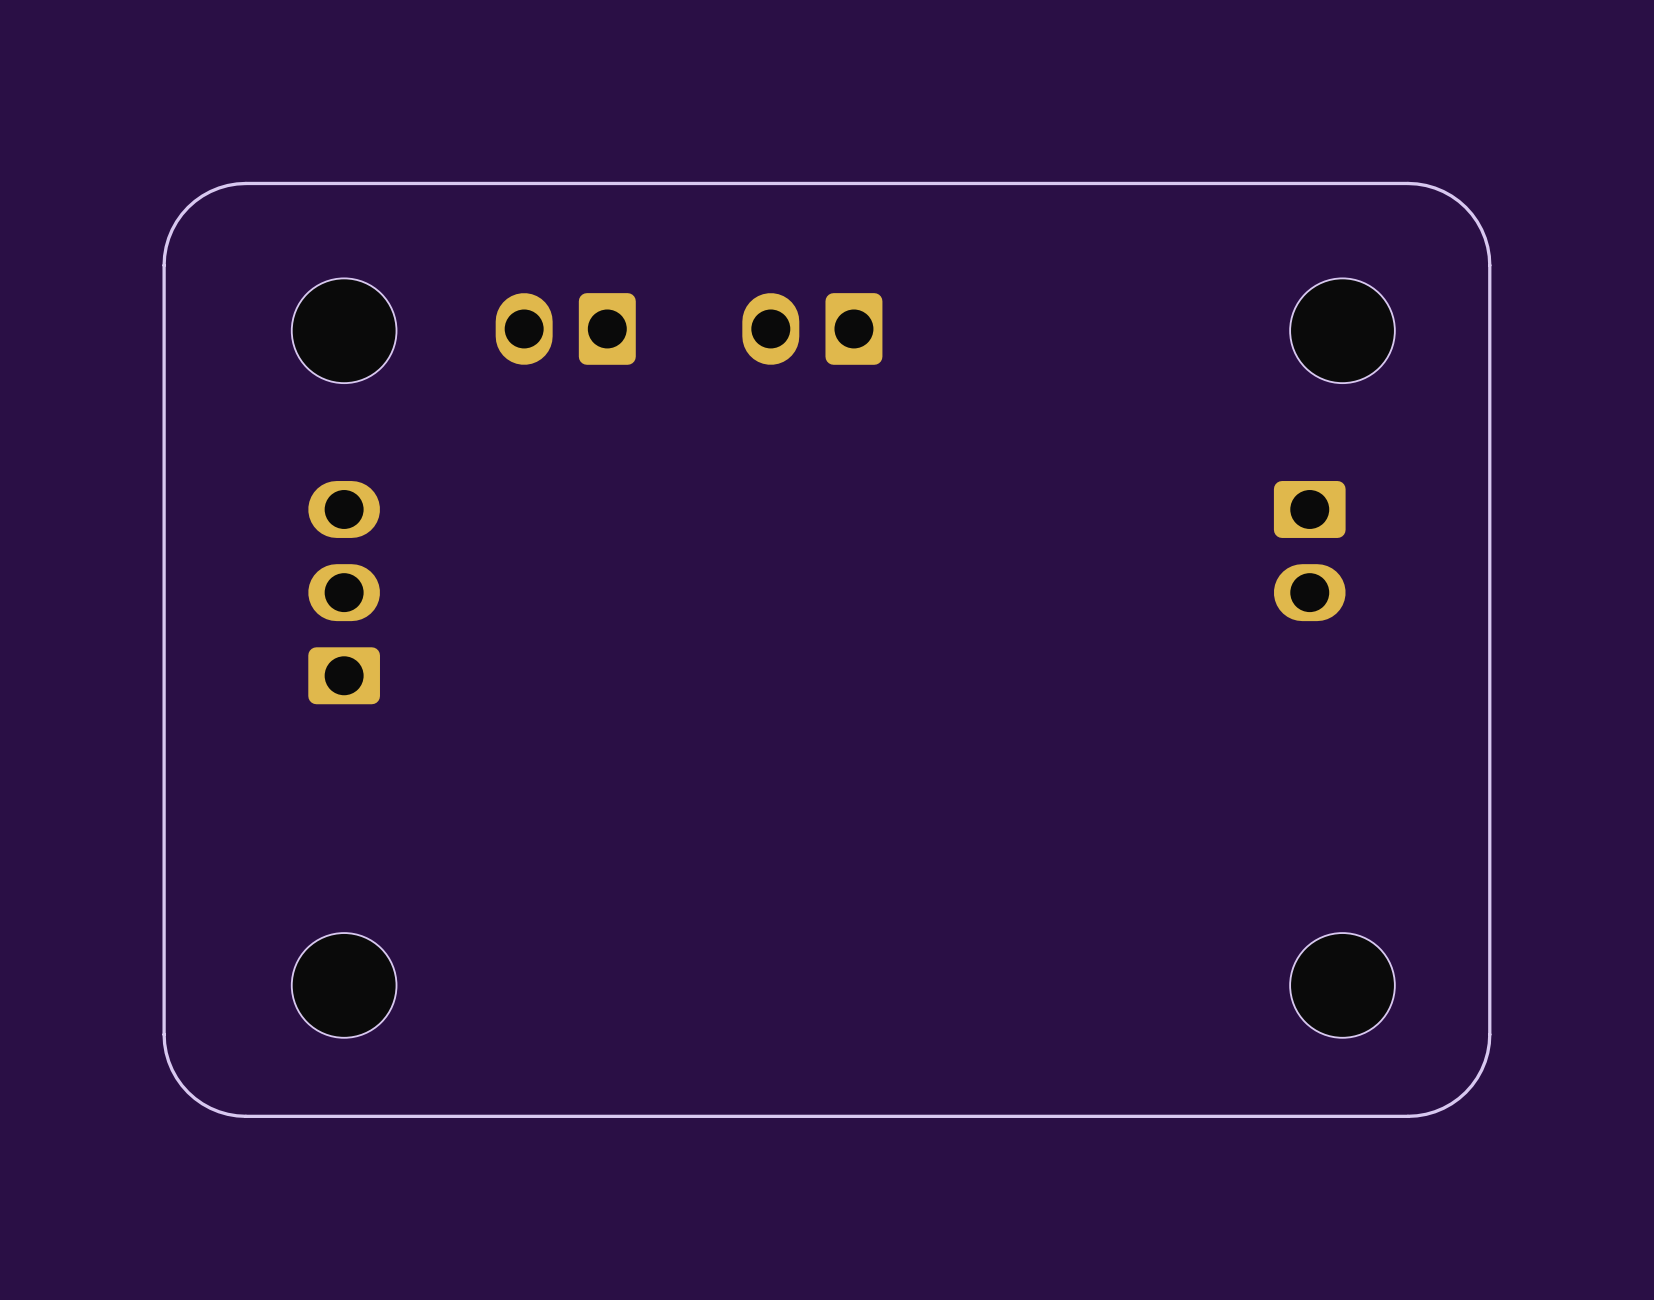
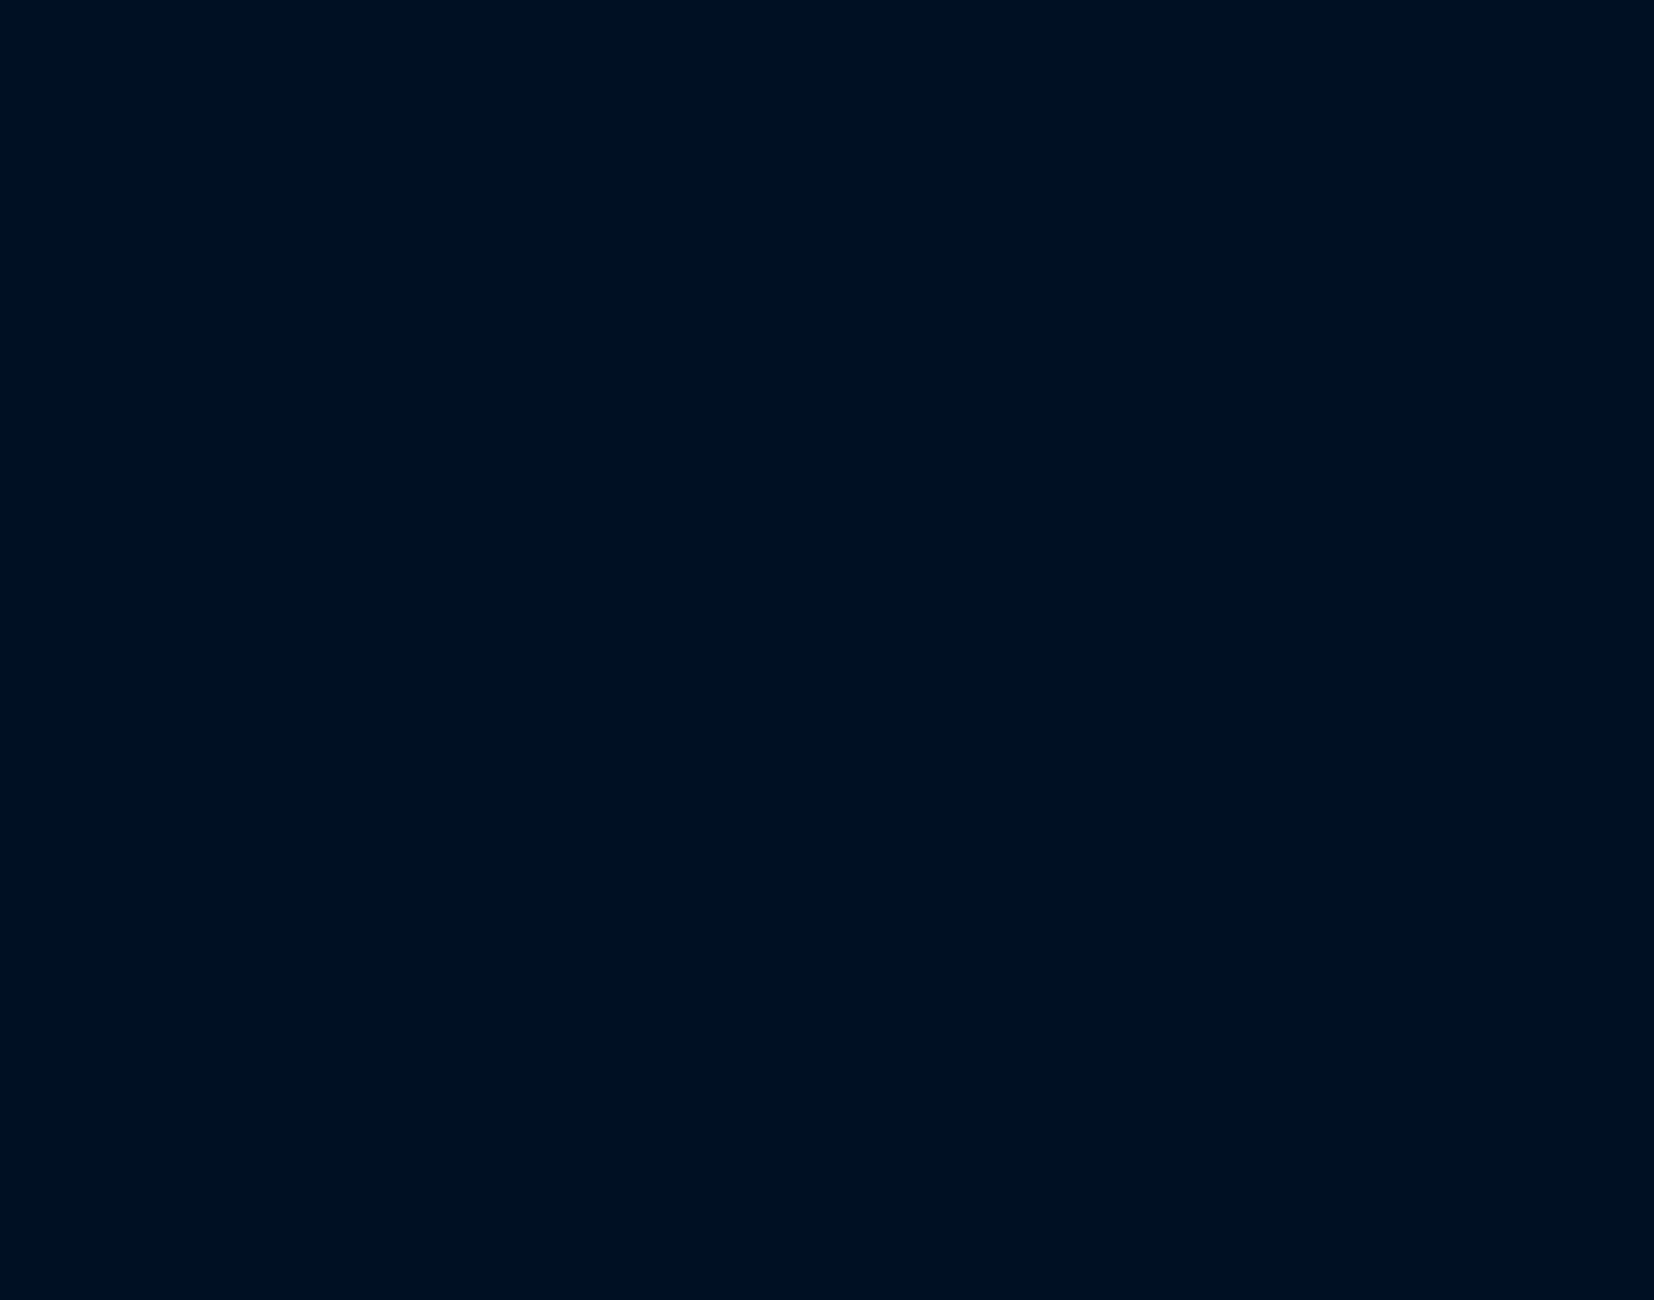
board edge: (1407, 183) (245, 183) (218, 188) (194, 201) (181, 214) (172, 229) (166, 247) (164, 265) (164, 1034) (168, 1061) (181, 1085) (194, 1098) (210, 1108) (227, 1114) (245, 1116) (1407, 1116) (1434, 1111) (1458, 1098) (1471, 1085) (1481, 1070) (1487, 1052) (1489, 1034) (1489, 265) (1485, 238) (1477, 221) (1465, 207) (1443, 191) (1426, 185) (1407, 183) -> none
part: (565, 328) -> none
part: (812, 328) -> none
part: (344, 330) -> none
part: (1342, 330) -> none
part: (1309, 551) -> none
part: (344, 592) -> none
part: (344, 985) -> none
part: (1342, 985) -> none

